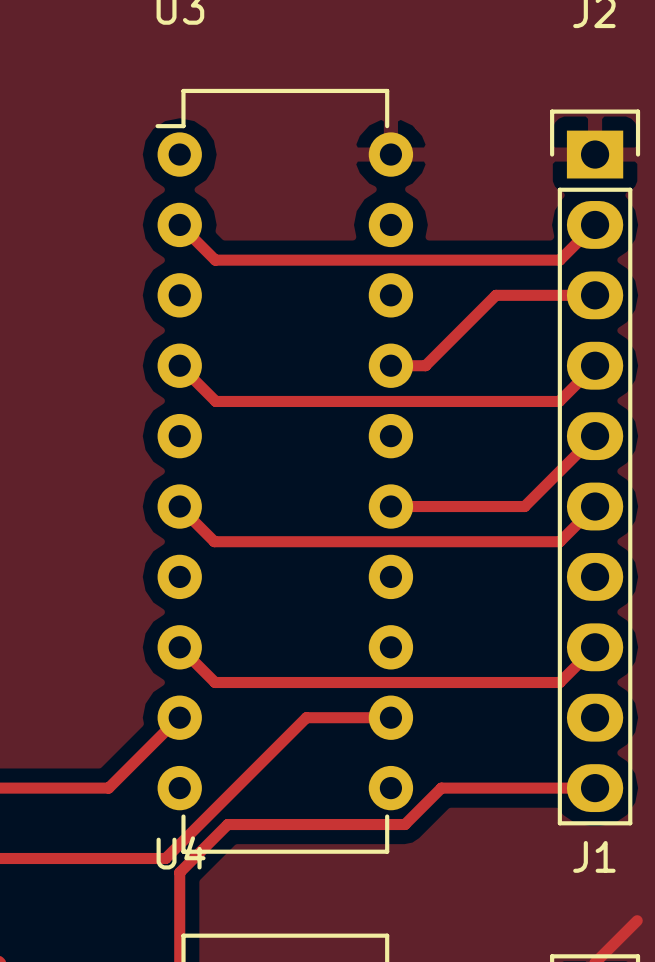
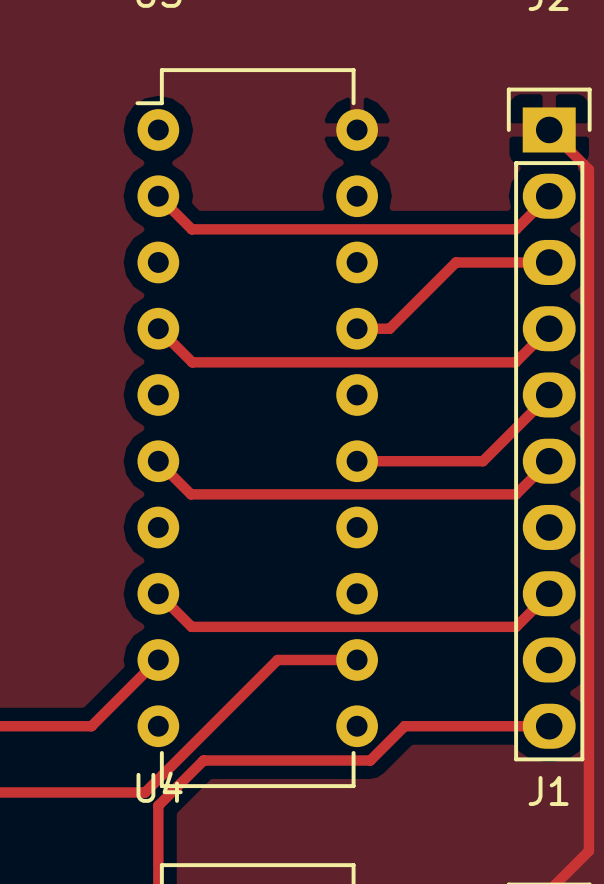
track: none -> (549, 129) (588, 169) (588, 851)

